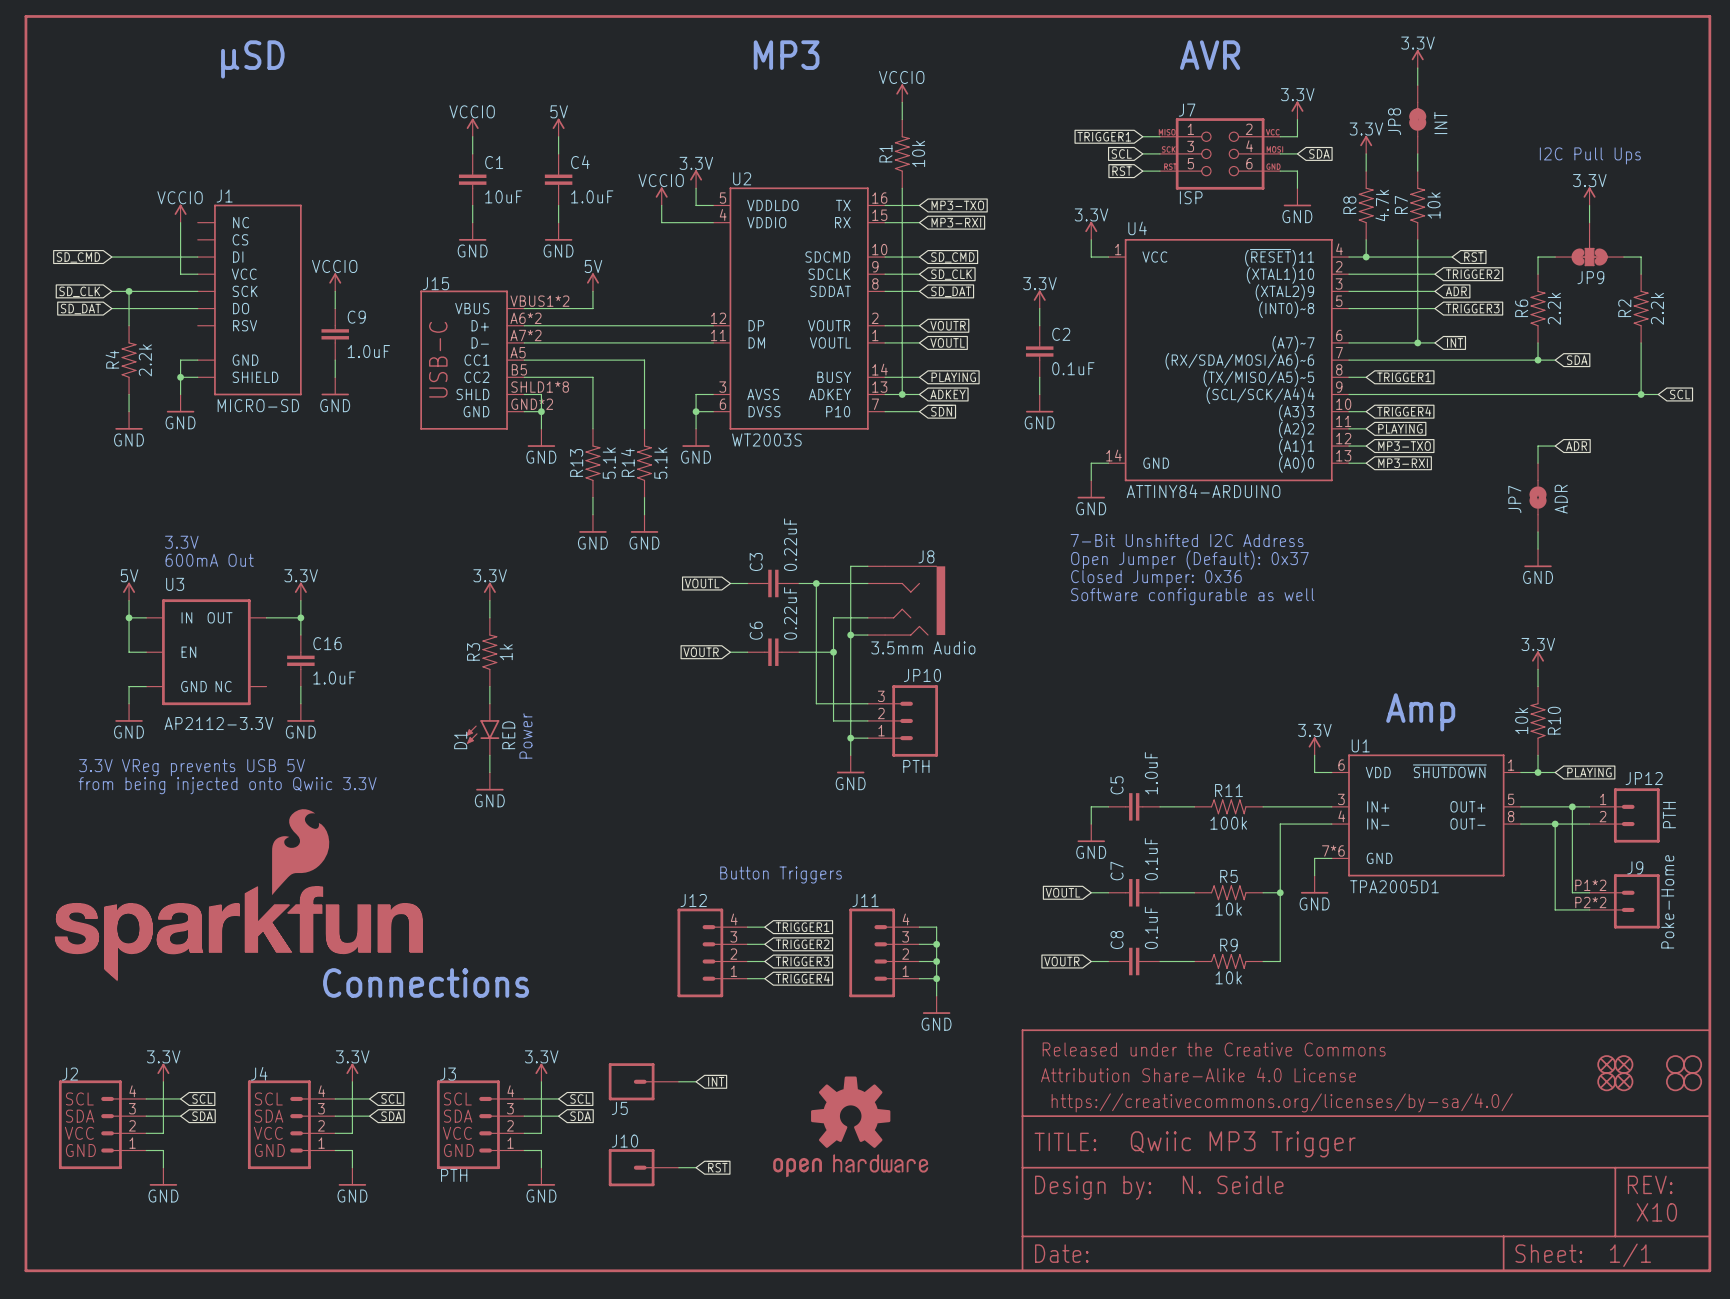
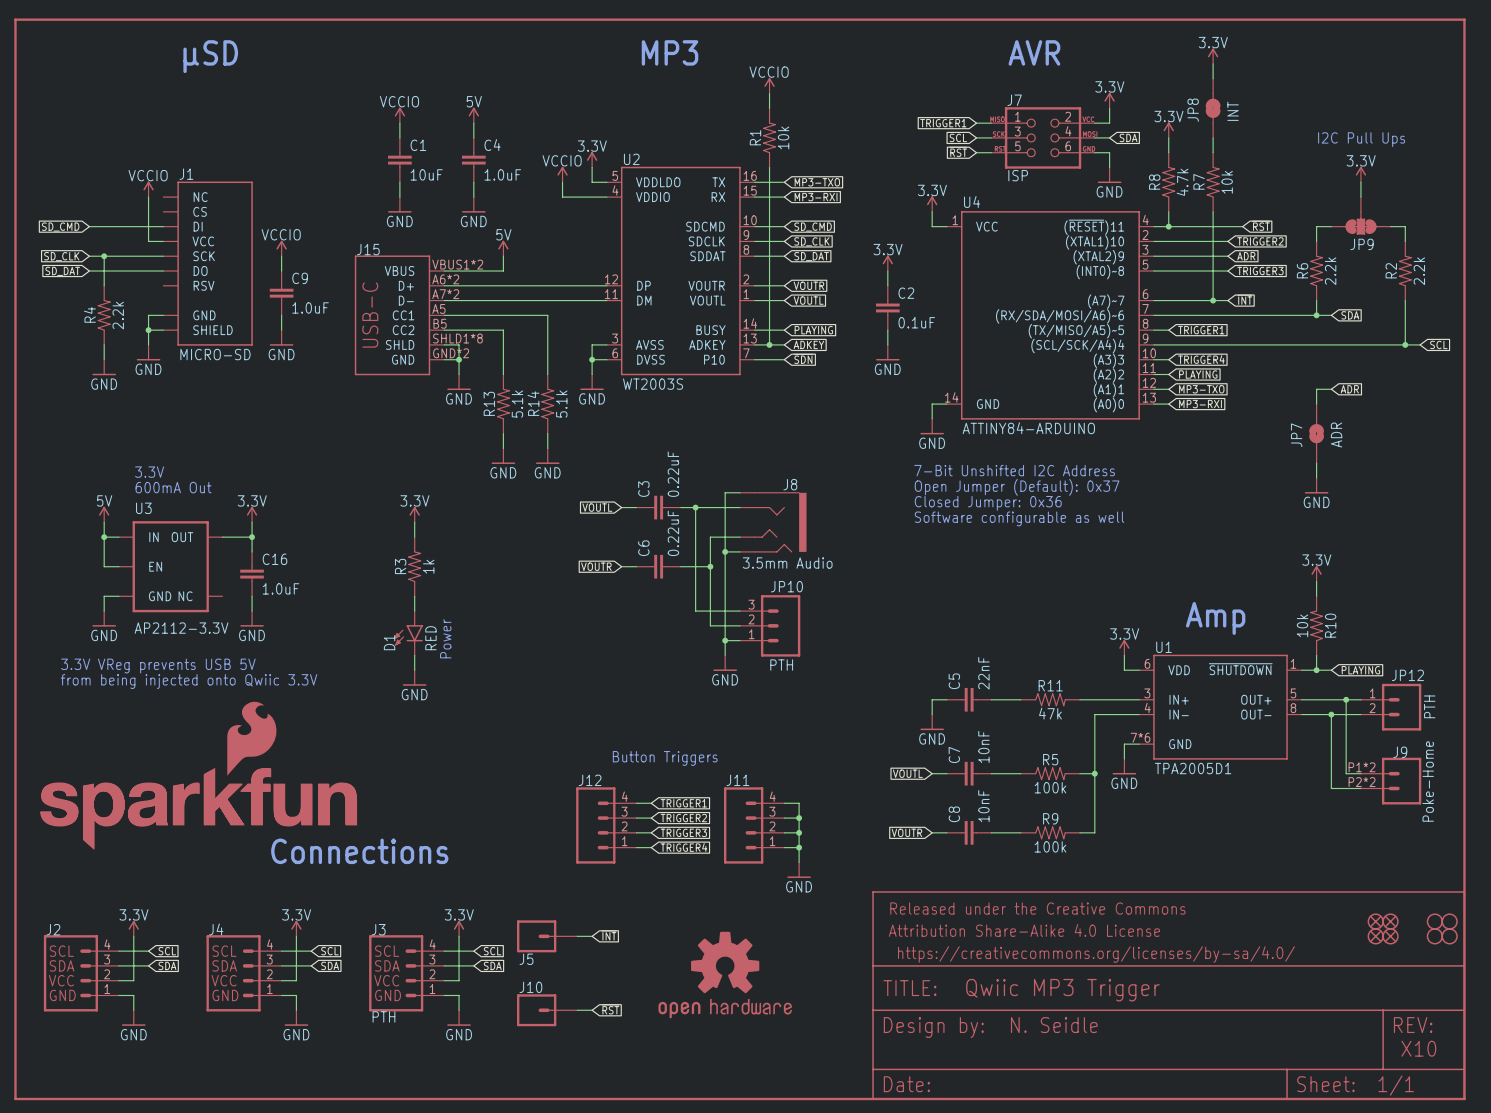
C5 value: 1.0uF (1151, 773) -> 22nF (983, 673)
R11 value: 100k (1228, 823) -> 47k (1050, 713)
C7 value: 0.1uF (1151, 859) -> 10nF (983, 746)
R5 value: 10k (1228, 909) -> 100k (1050, 787)
C8 value: 0.1uF (1151, 927) -> 10nF (983, 806)
R9 value: 10k (1228, 977) -> 100k (1050, 846)

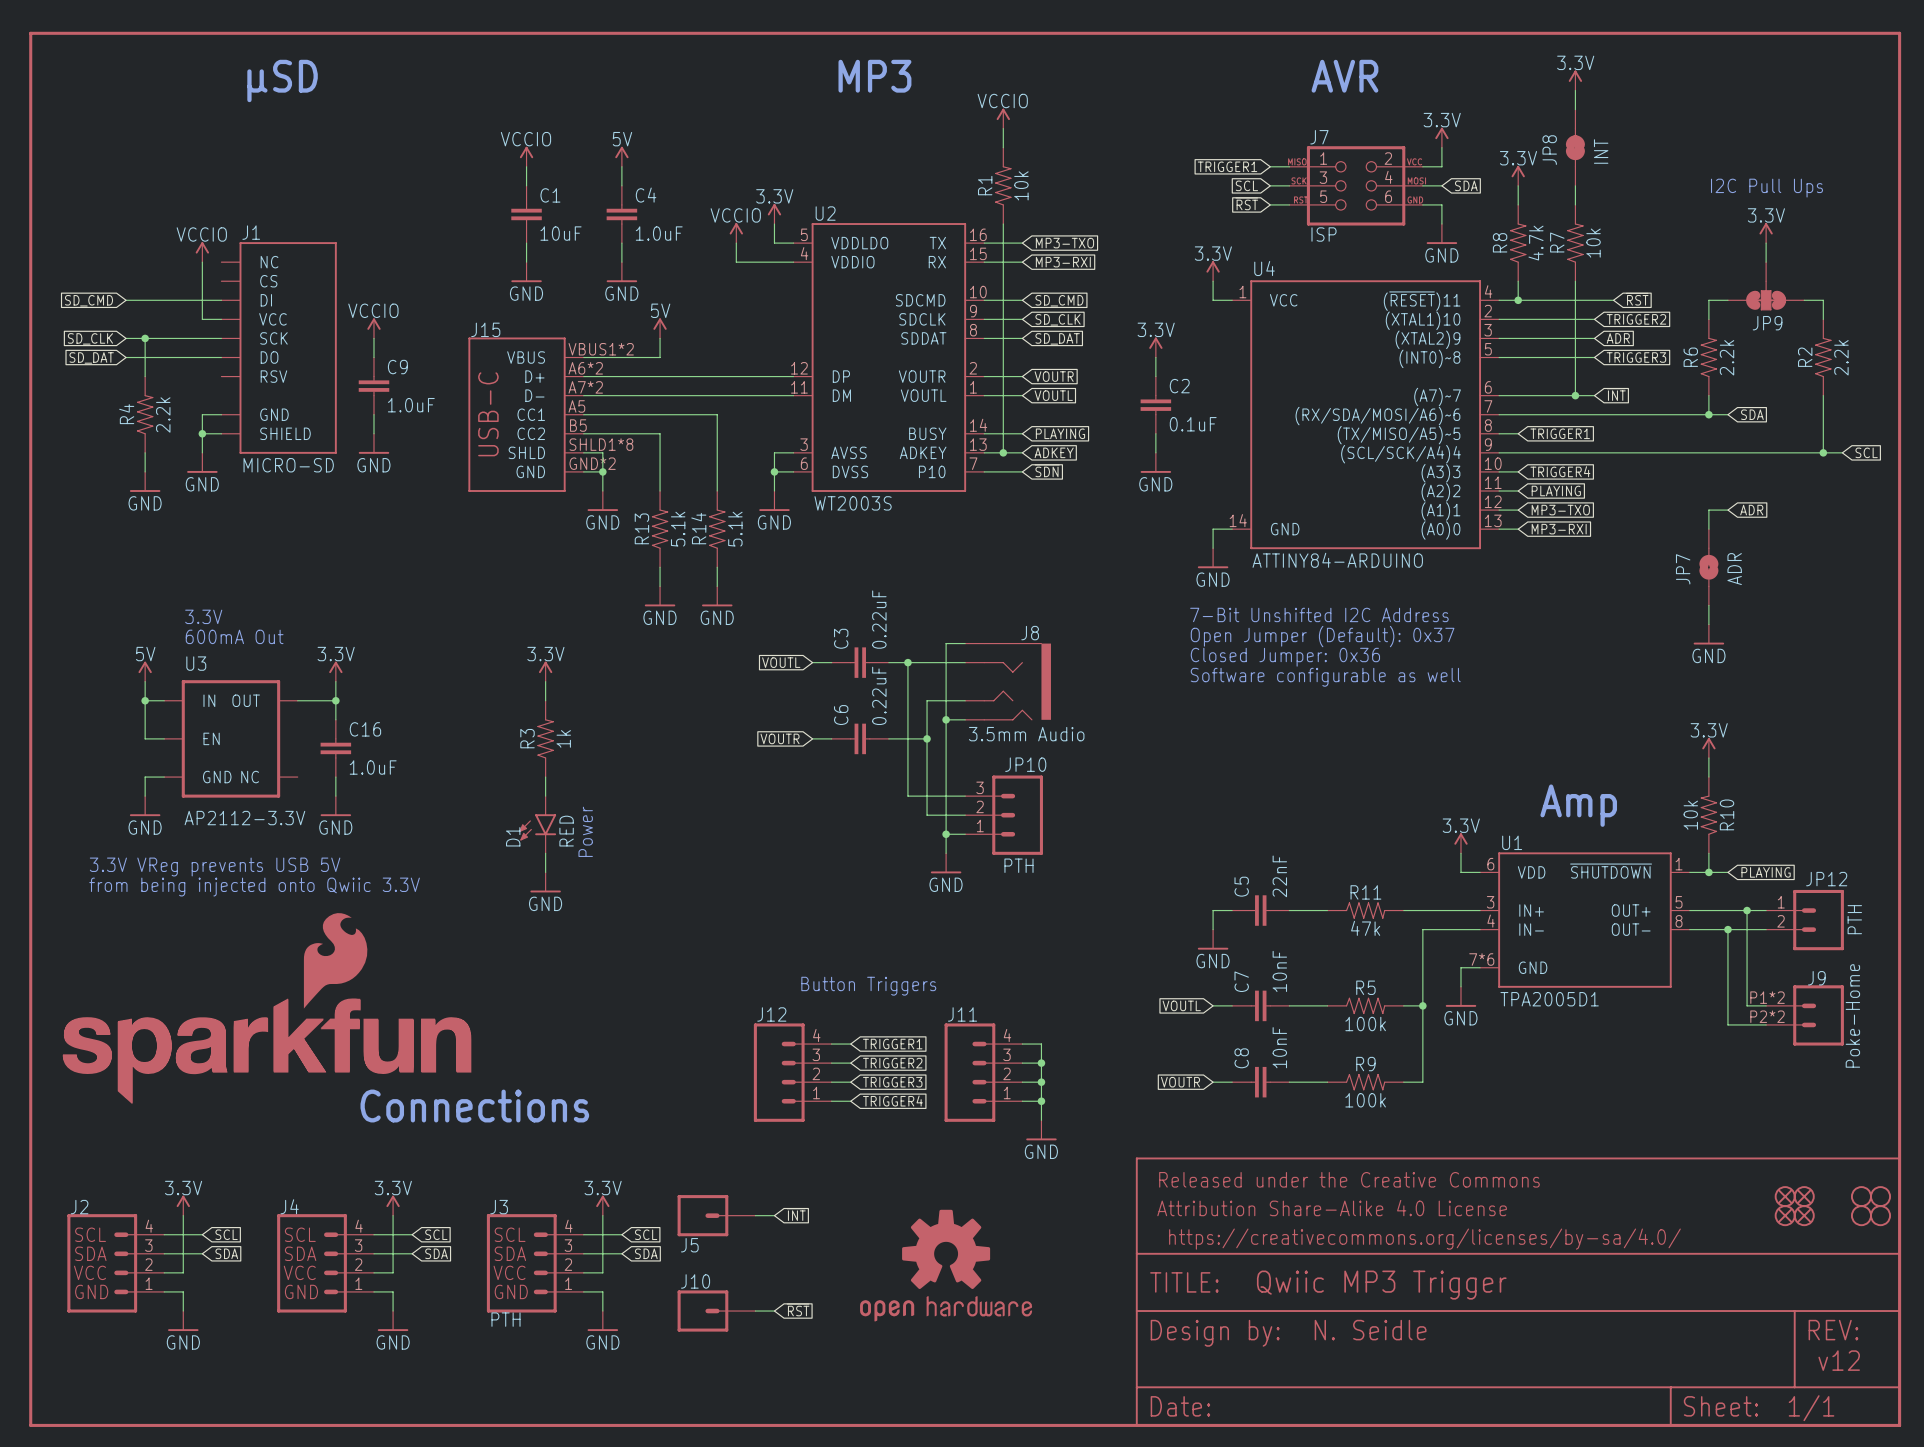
text: X10 (1418, 1048) -> v12 (1839, 1360)

